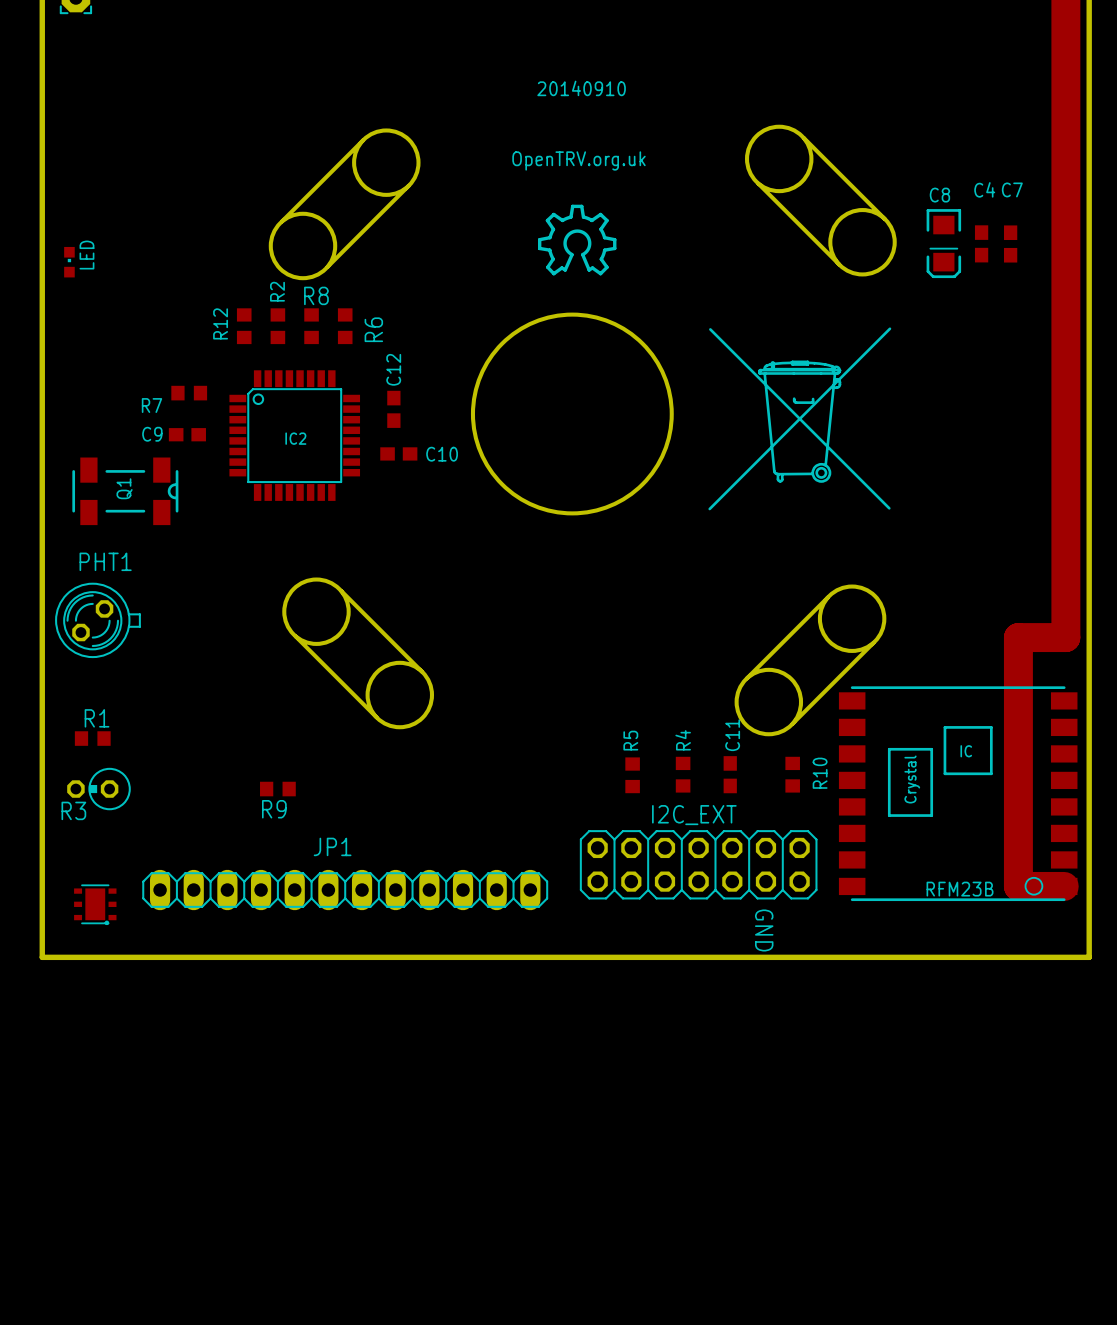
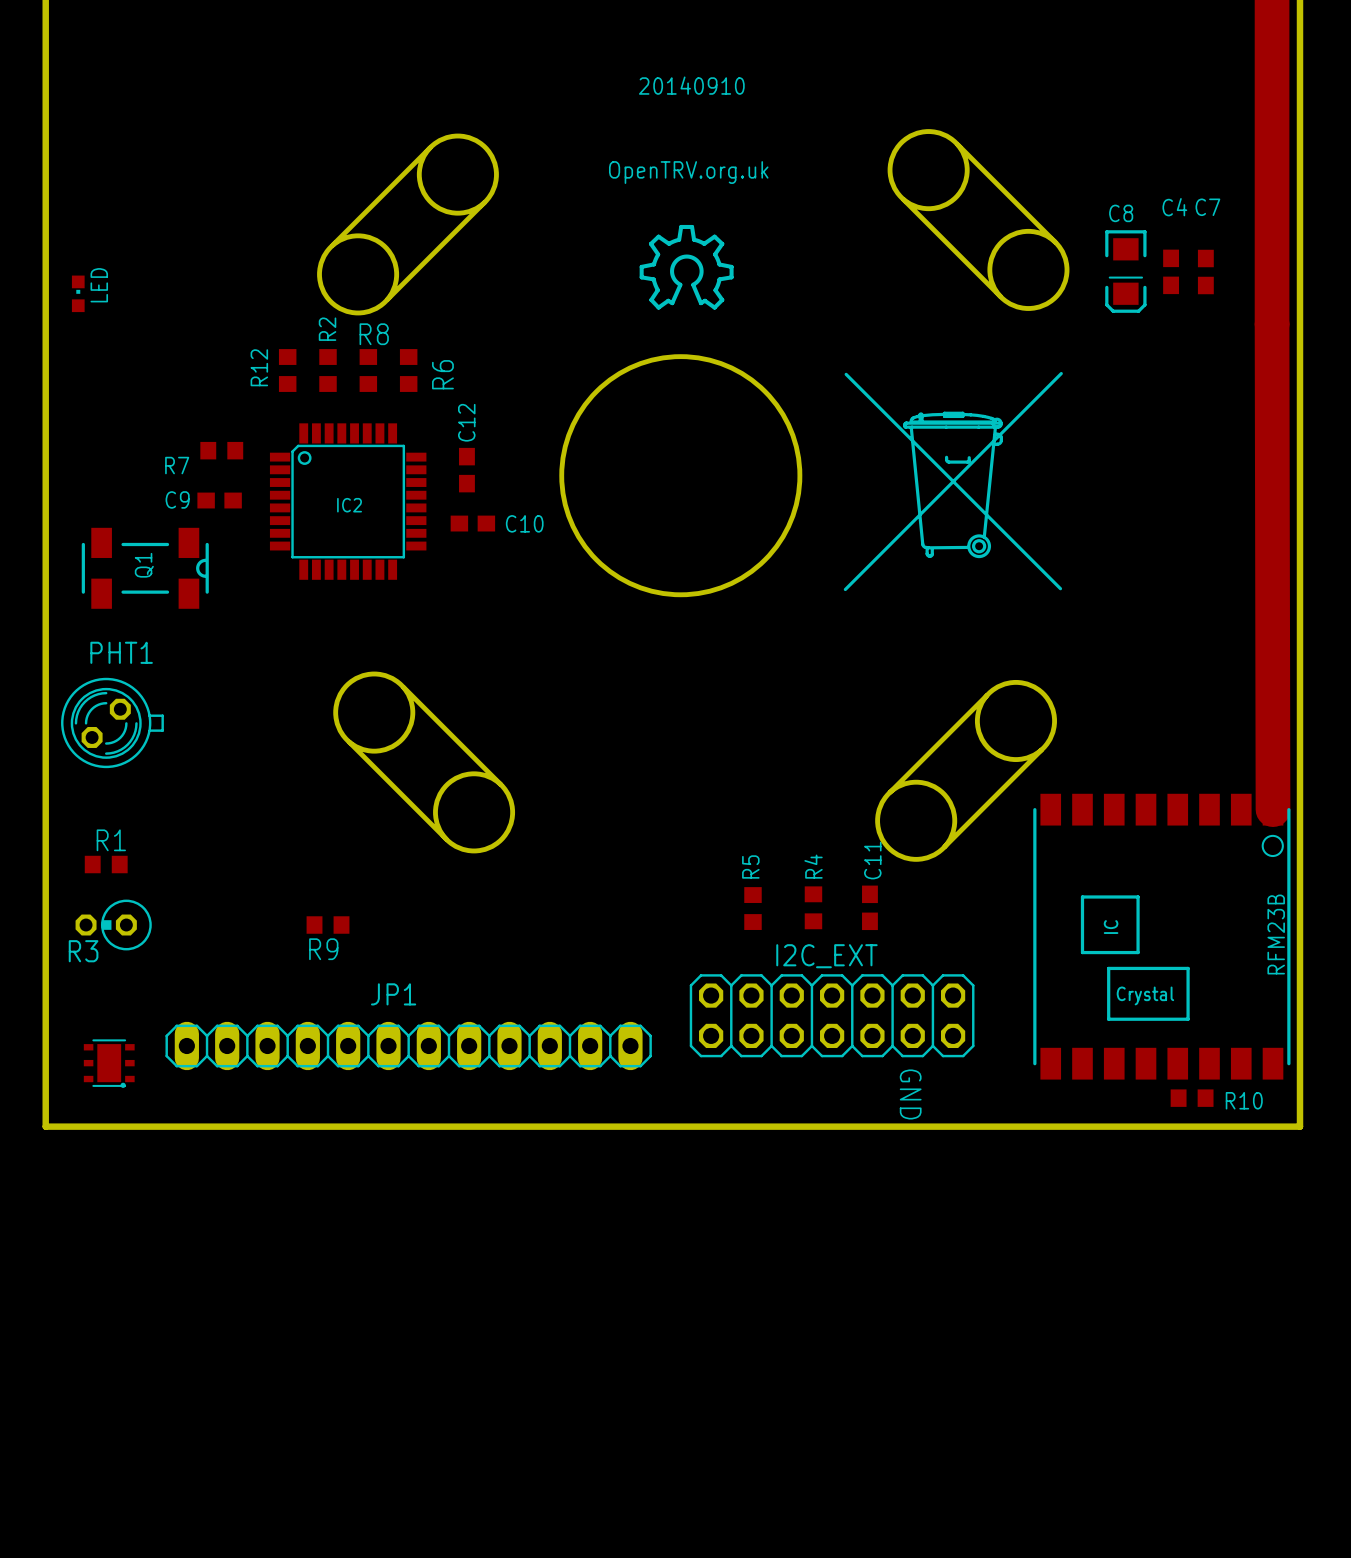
track: (1065, 287) (1065, 637) (1018, 637) (1018, 886) (1064, 886) -> (1272, 324) (1273, 809)
RFM23B footprint: [838, 686, 1078, 902] -> [1033, 793, 1291, 1080]
R10 rotation: 0° (792, 774) -> 90° clockwise (1192, 1098)
R10 position: (792, 774) -> (1192, 1098)
RFM23B name position: RFM23B (960, 889) -> RFM23B (1276, 934)

